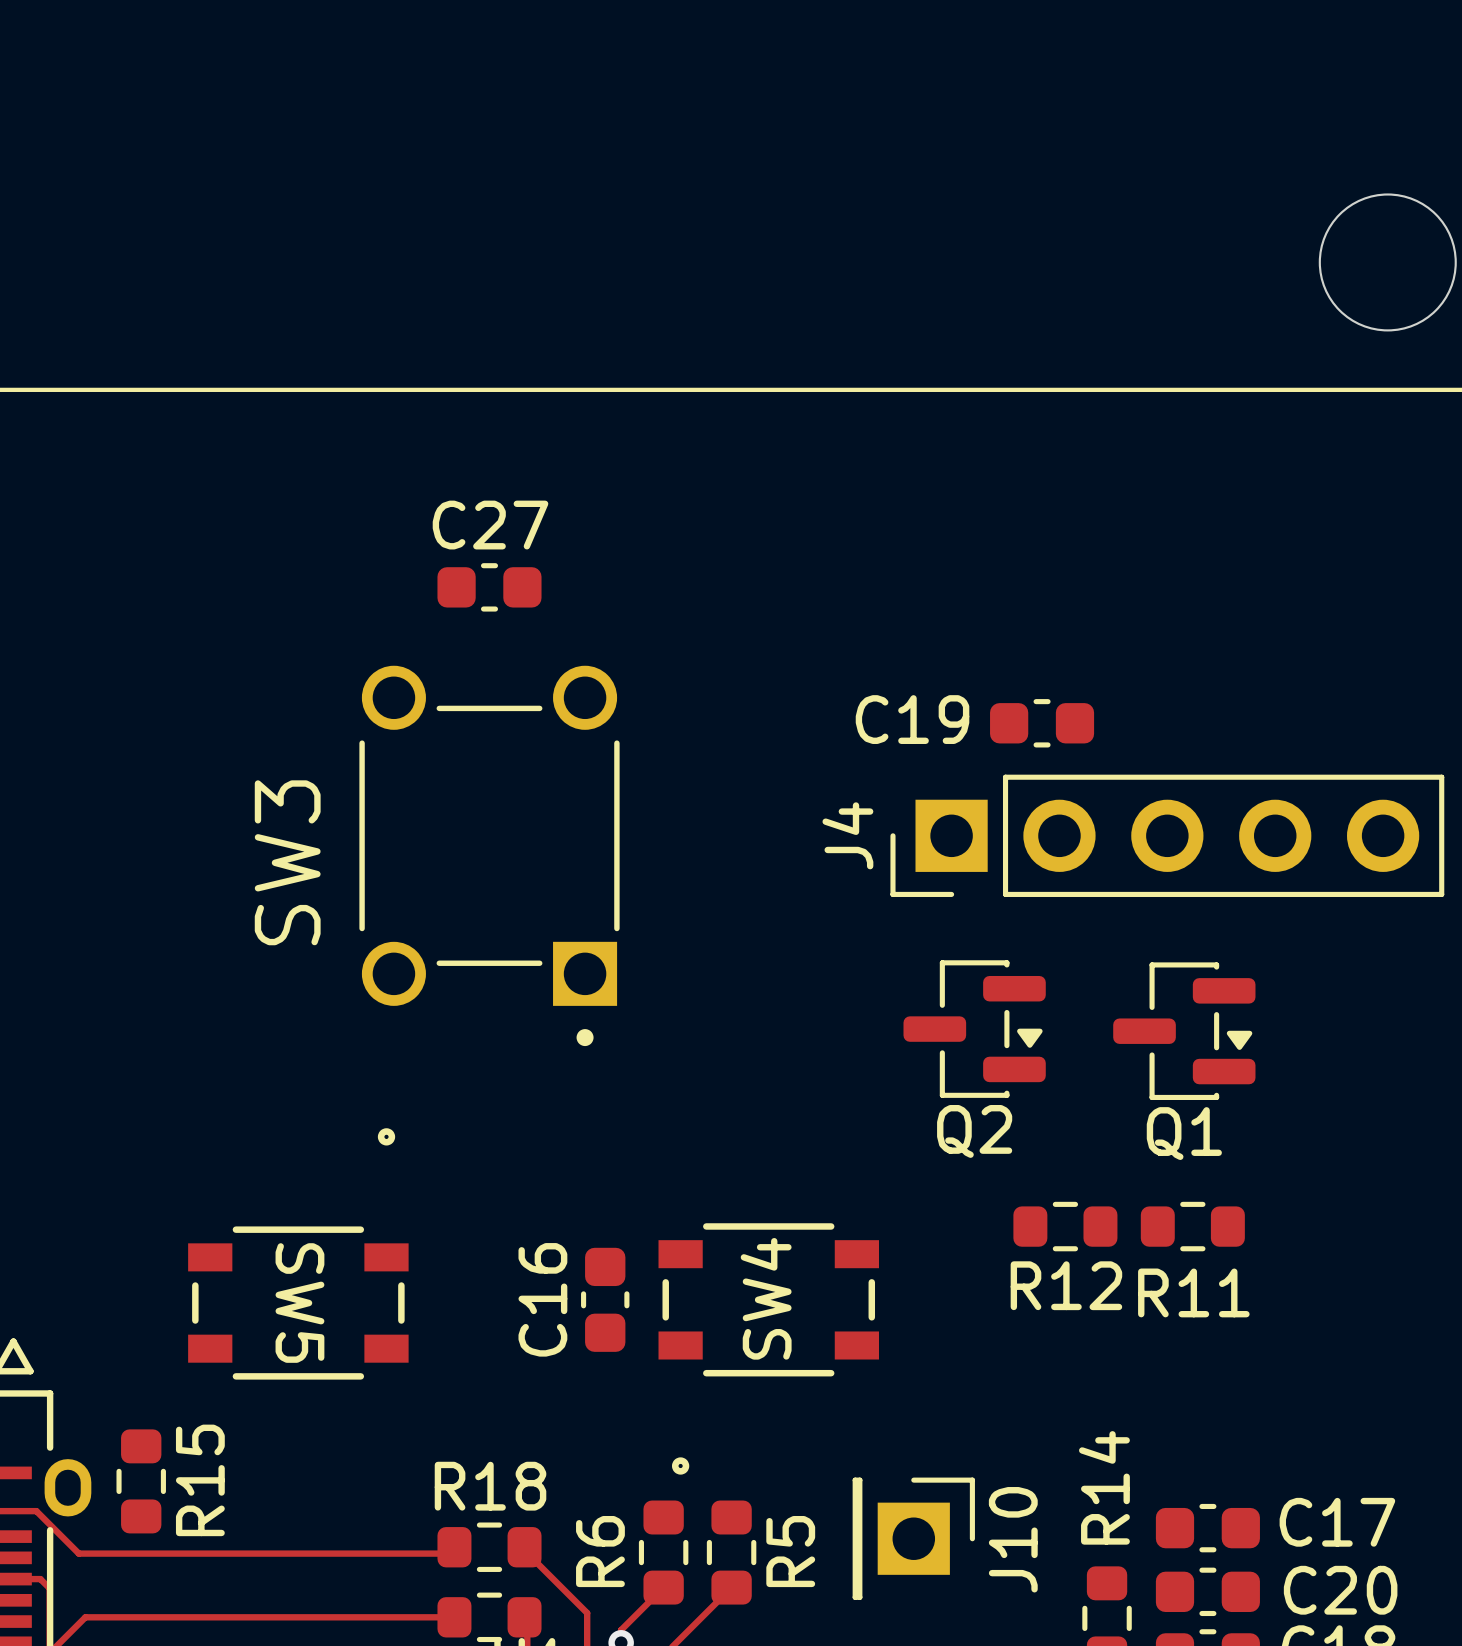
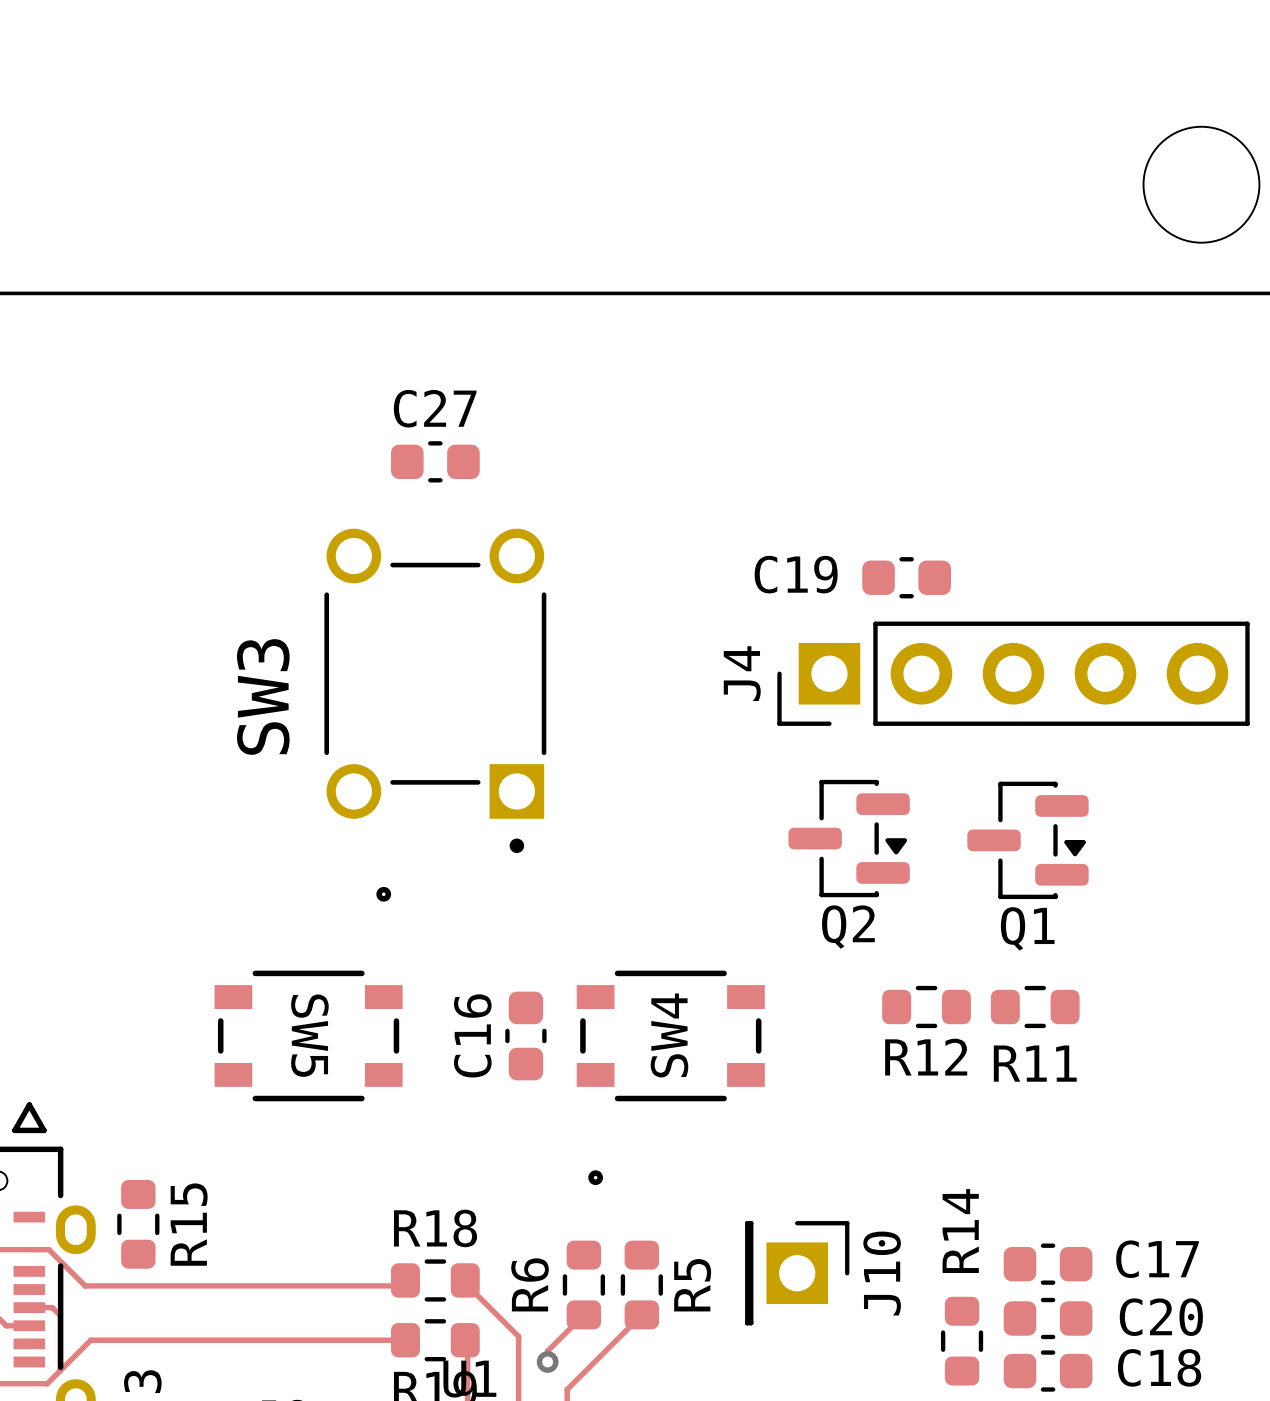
SW5 position: (298, 1253) -> (308, 994)
C16 position: (605, 1299) -> (525, 1035)
SW4 position: (768, 1348) -> (670, 1077)

